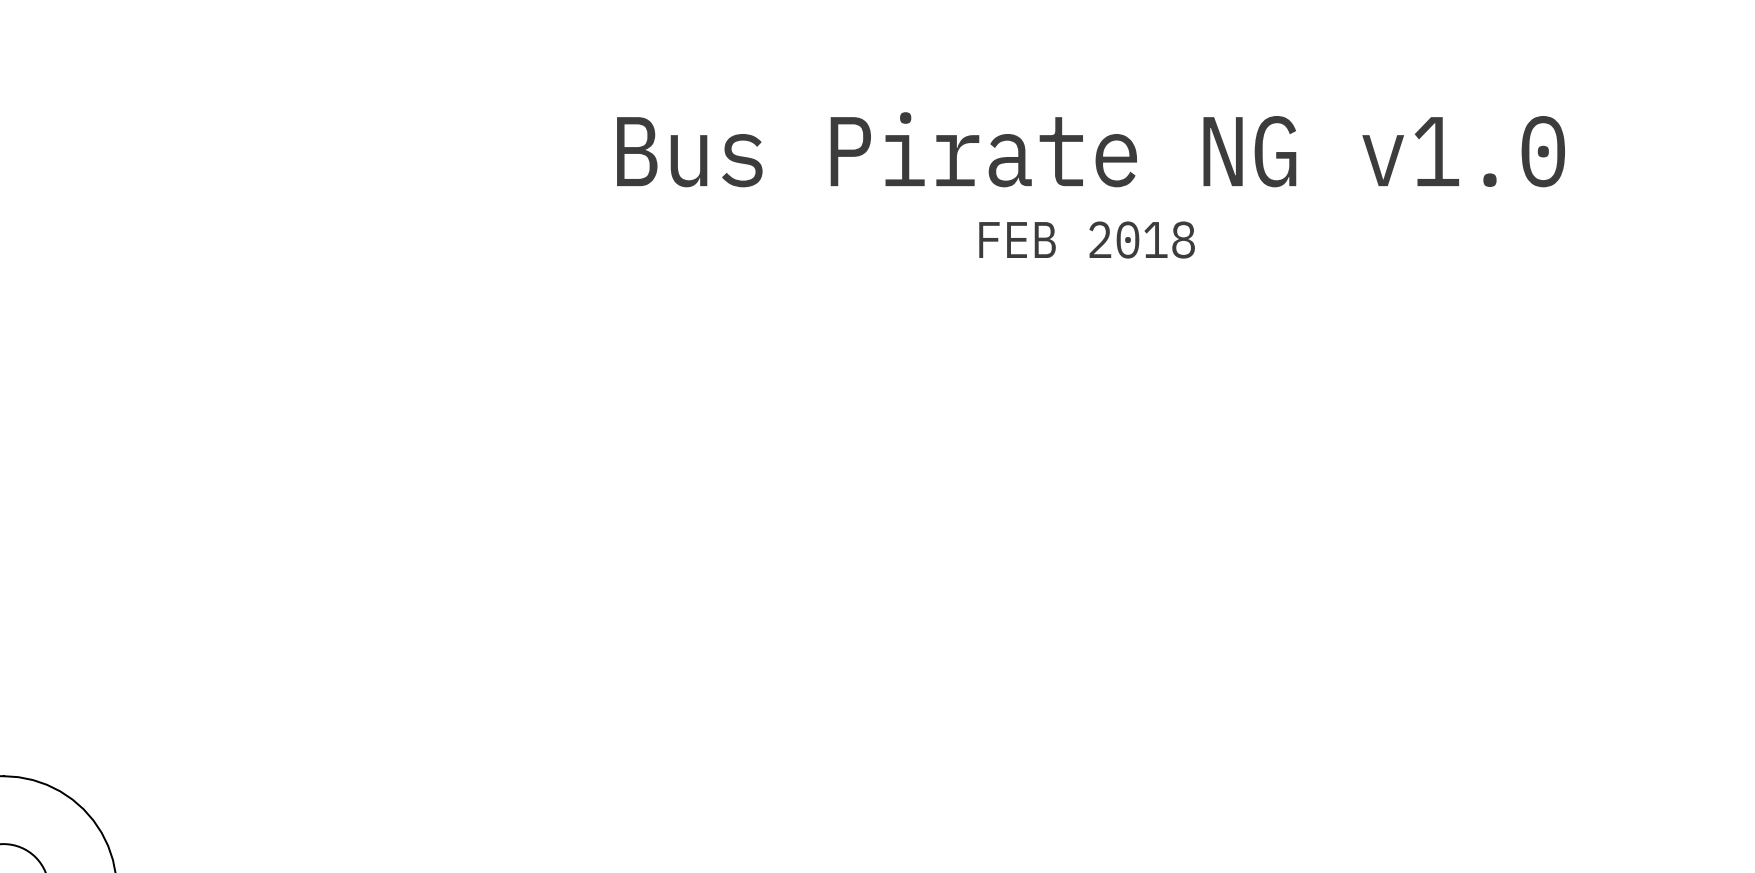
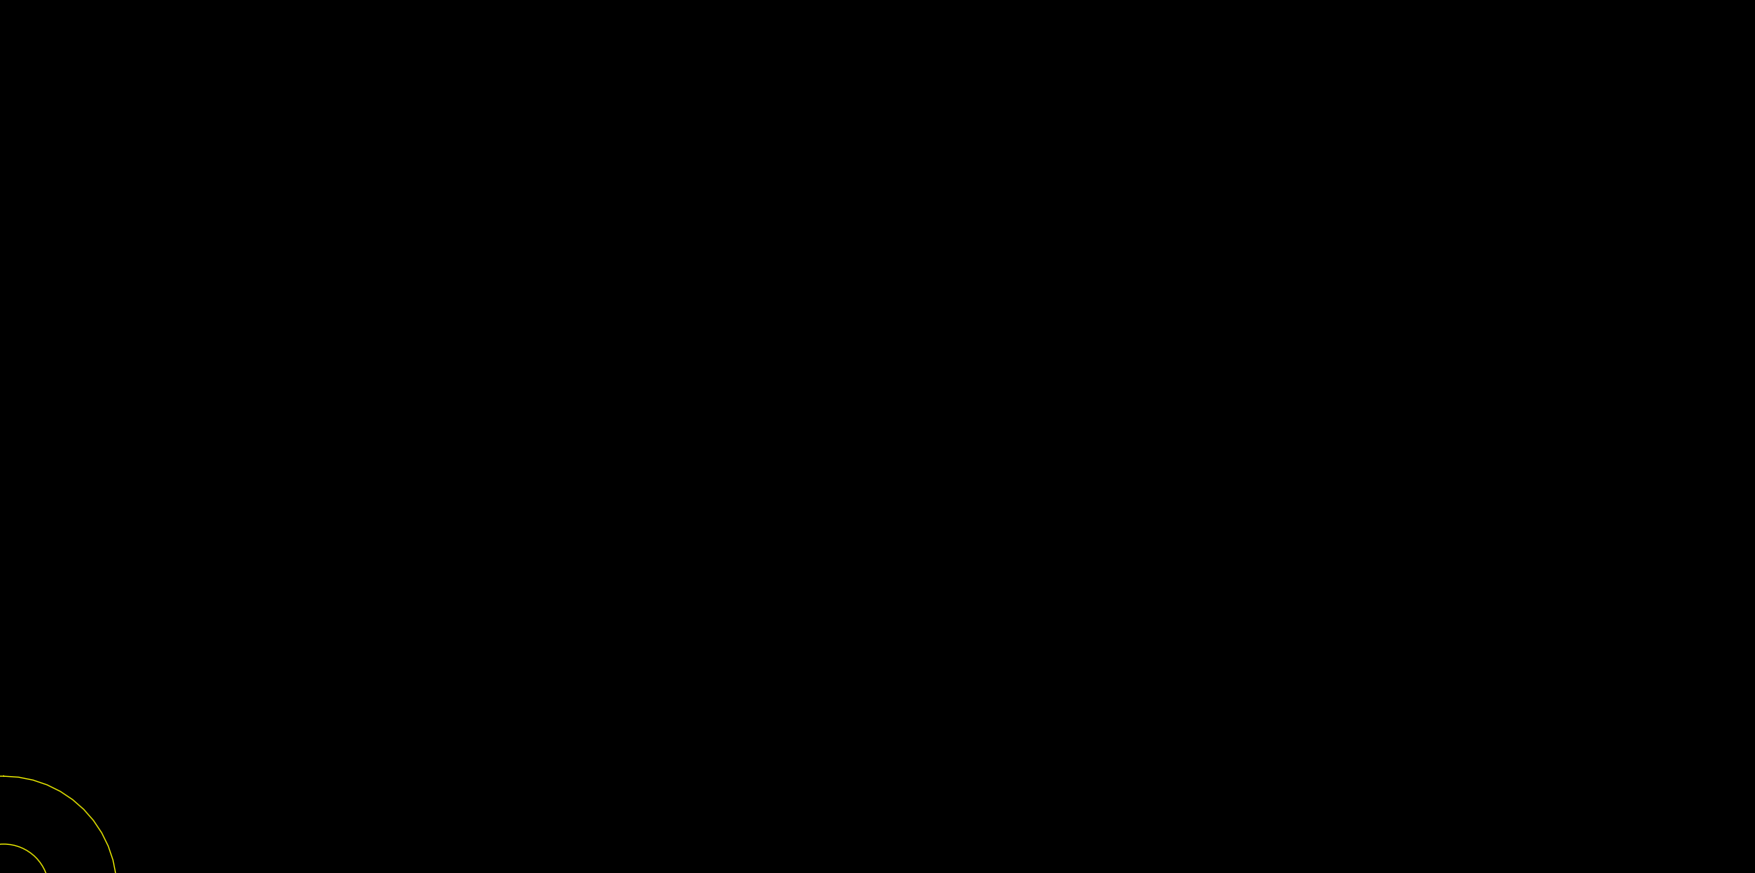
text: Bus Pirate NG v1.0 (1091, 149) -> none
text: FEB 2018 (1087, 240) -> none

